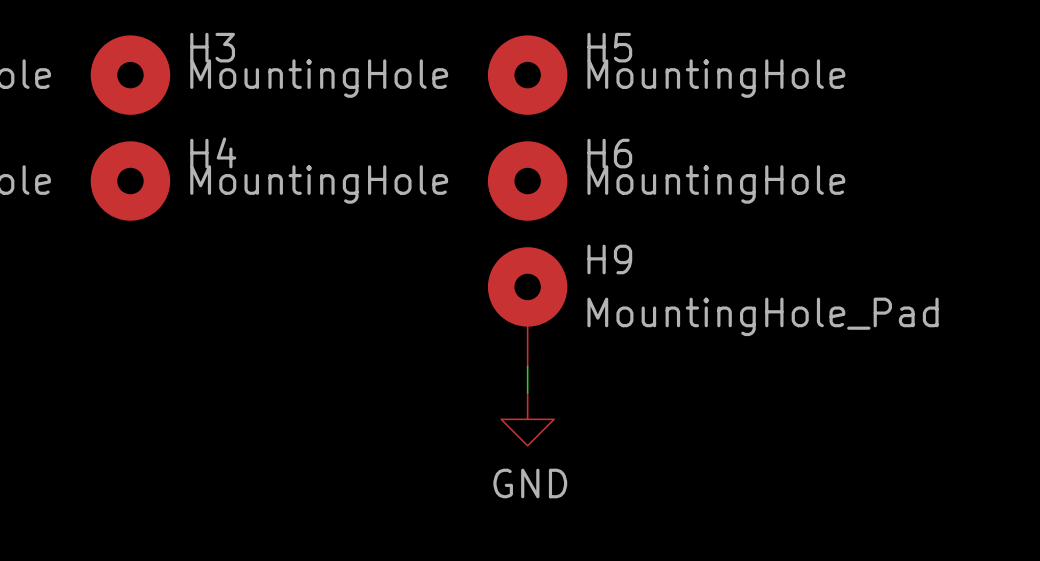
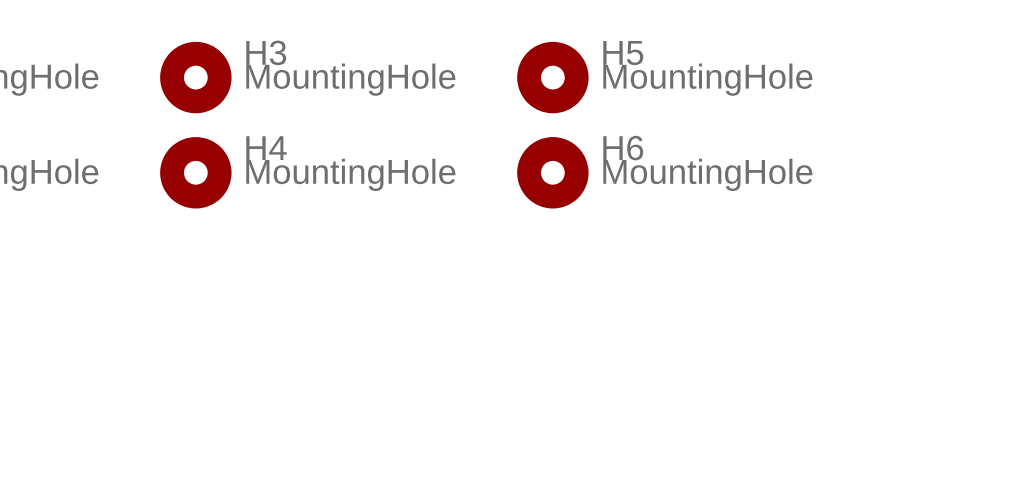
H9: MountingHole_Pad (527, 306) -> none
wire: (527, 366) (527, 392) -> none
power symbol: GND (527, 419) -> none

